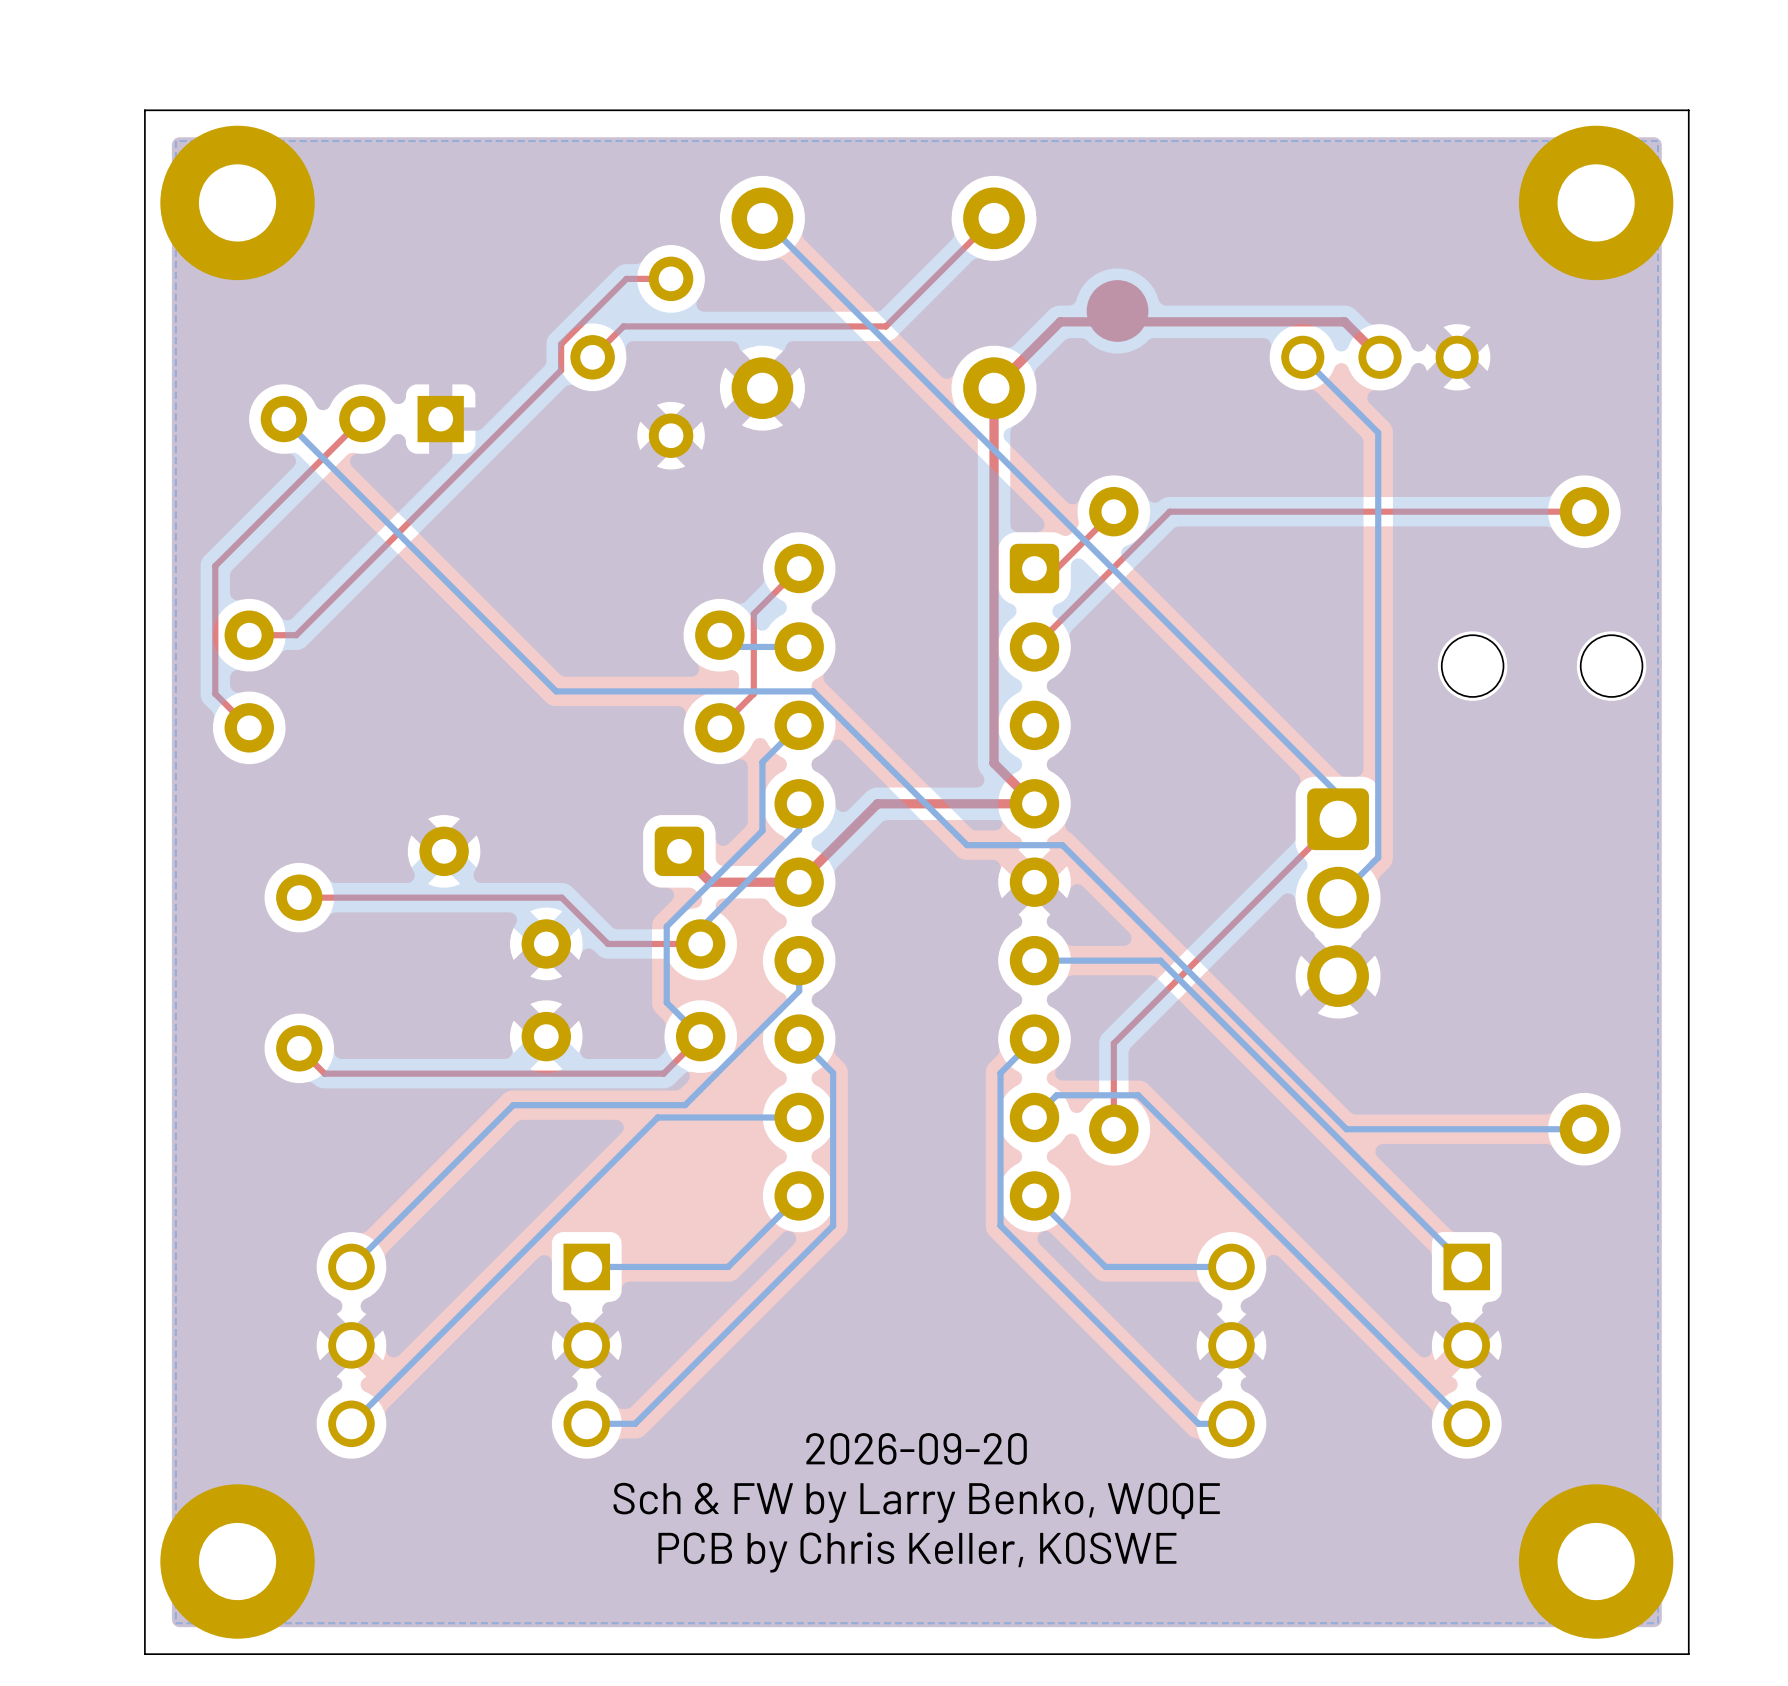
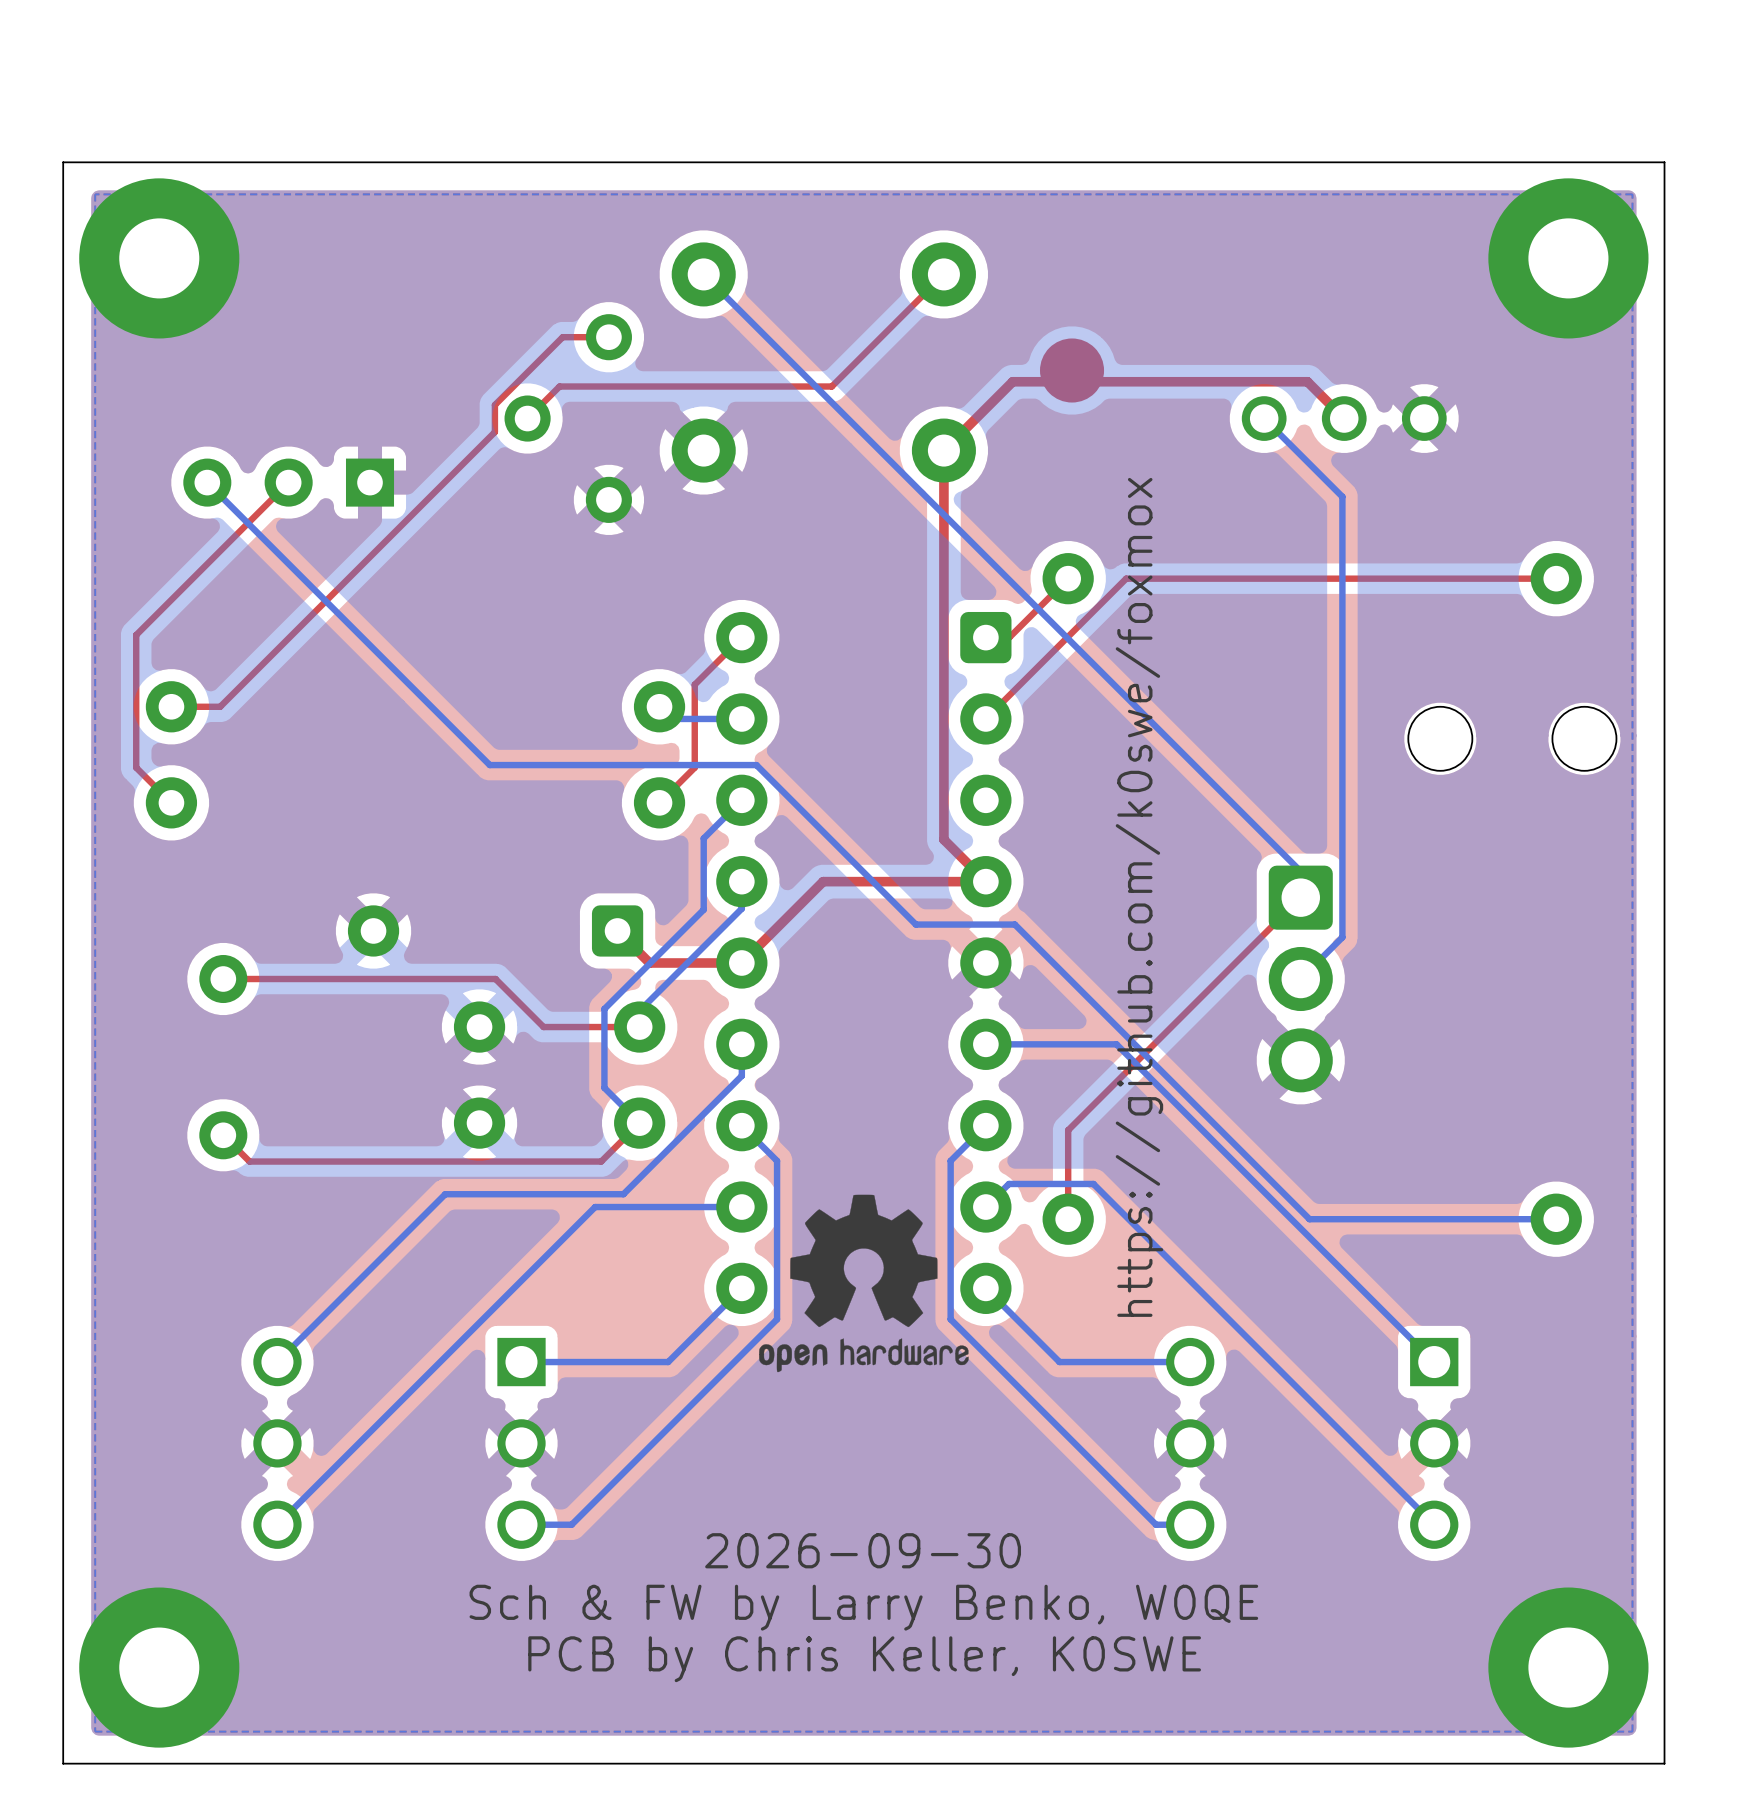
text: none -> https://github.com/k0swe/foxmox (1139, 897)
drawing: none -> [759, 1194, 969, 1373]
text: 2026-09-20 (916, 1448) -> 2026-09-30 (863, 1550)

